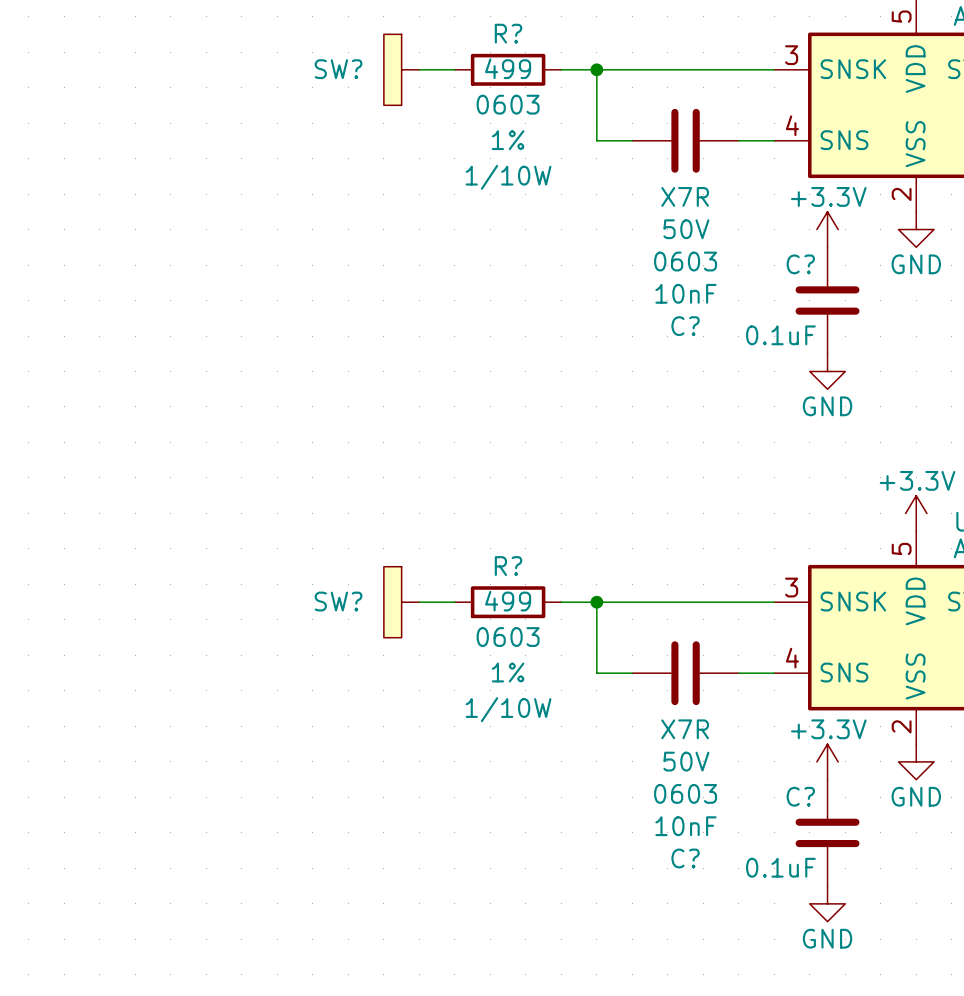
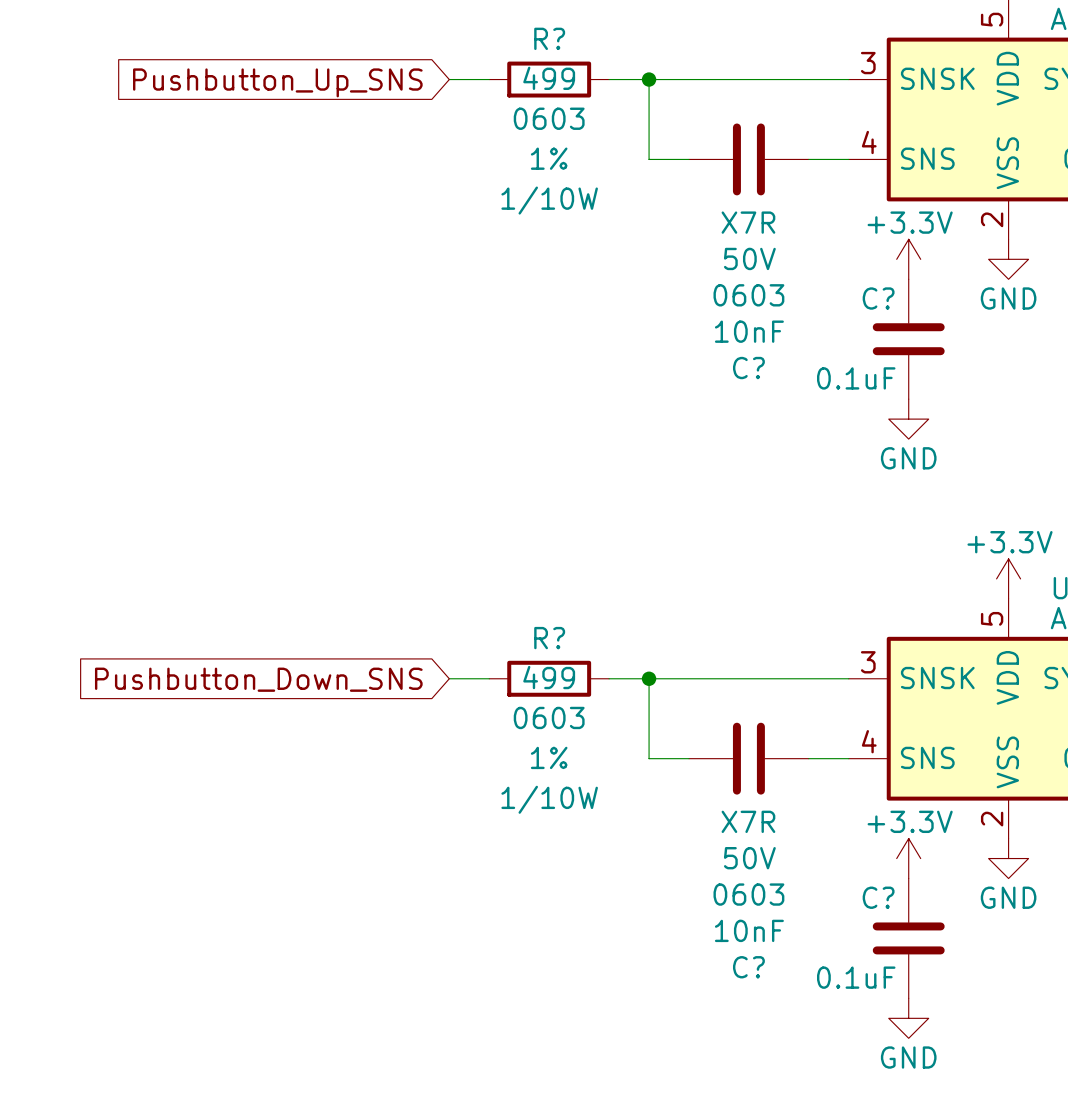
SW?: (401, 69) -> none
global label: none -> Pushbutton_Up_SNS (277, 82)
SW?: (401, 602) -> none
global label: none -> Pushbutton_Down_SNS (258, 679)

